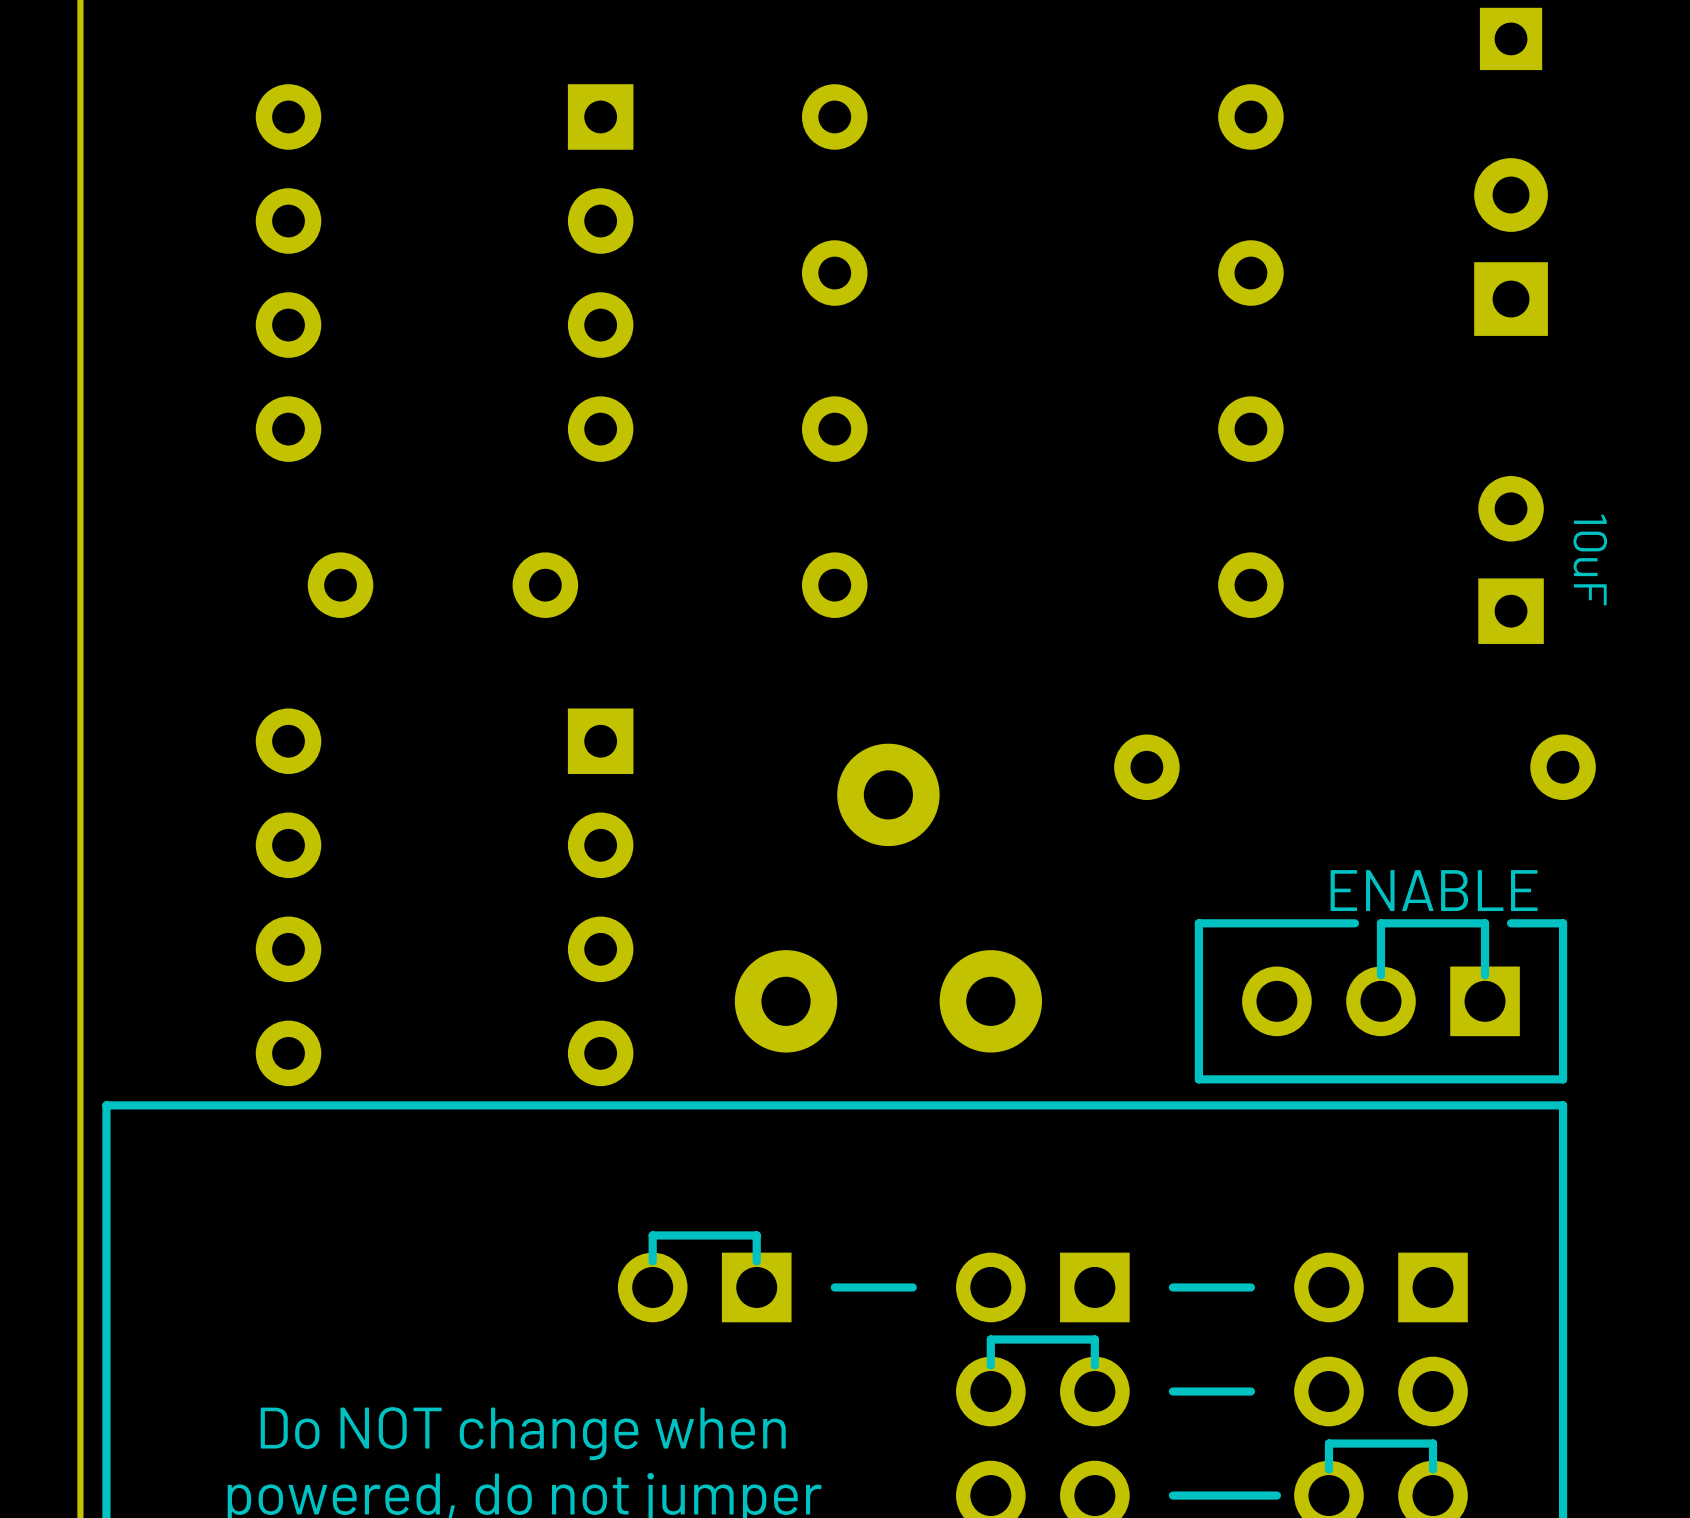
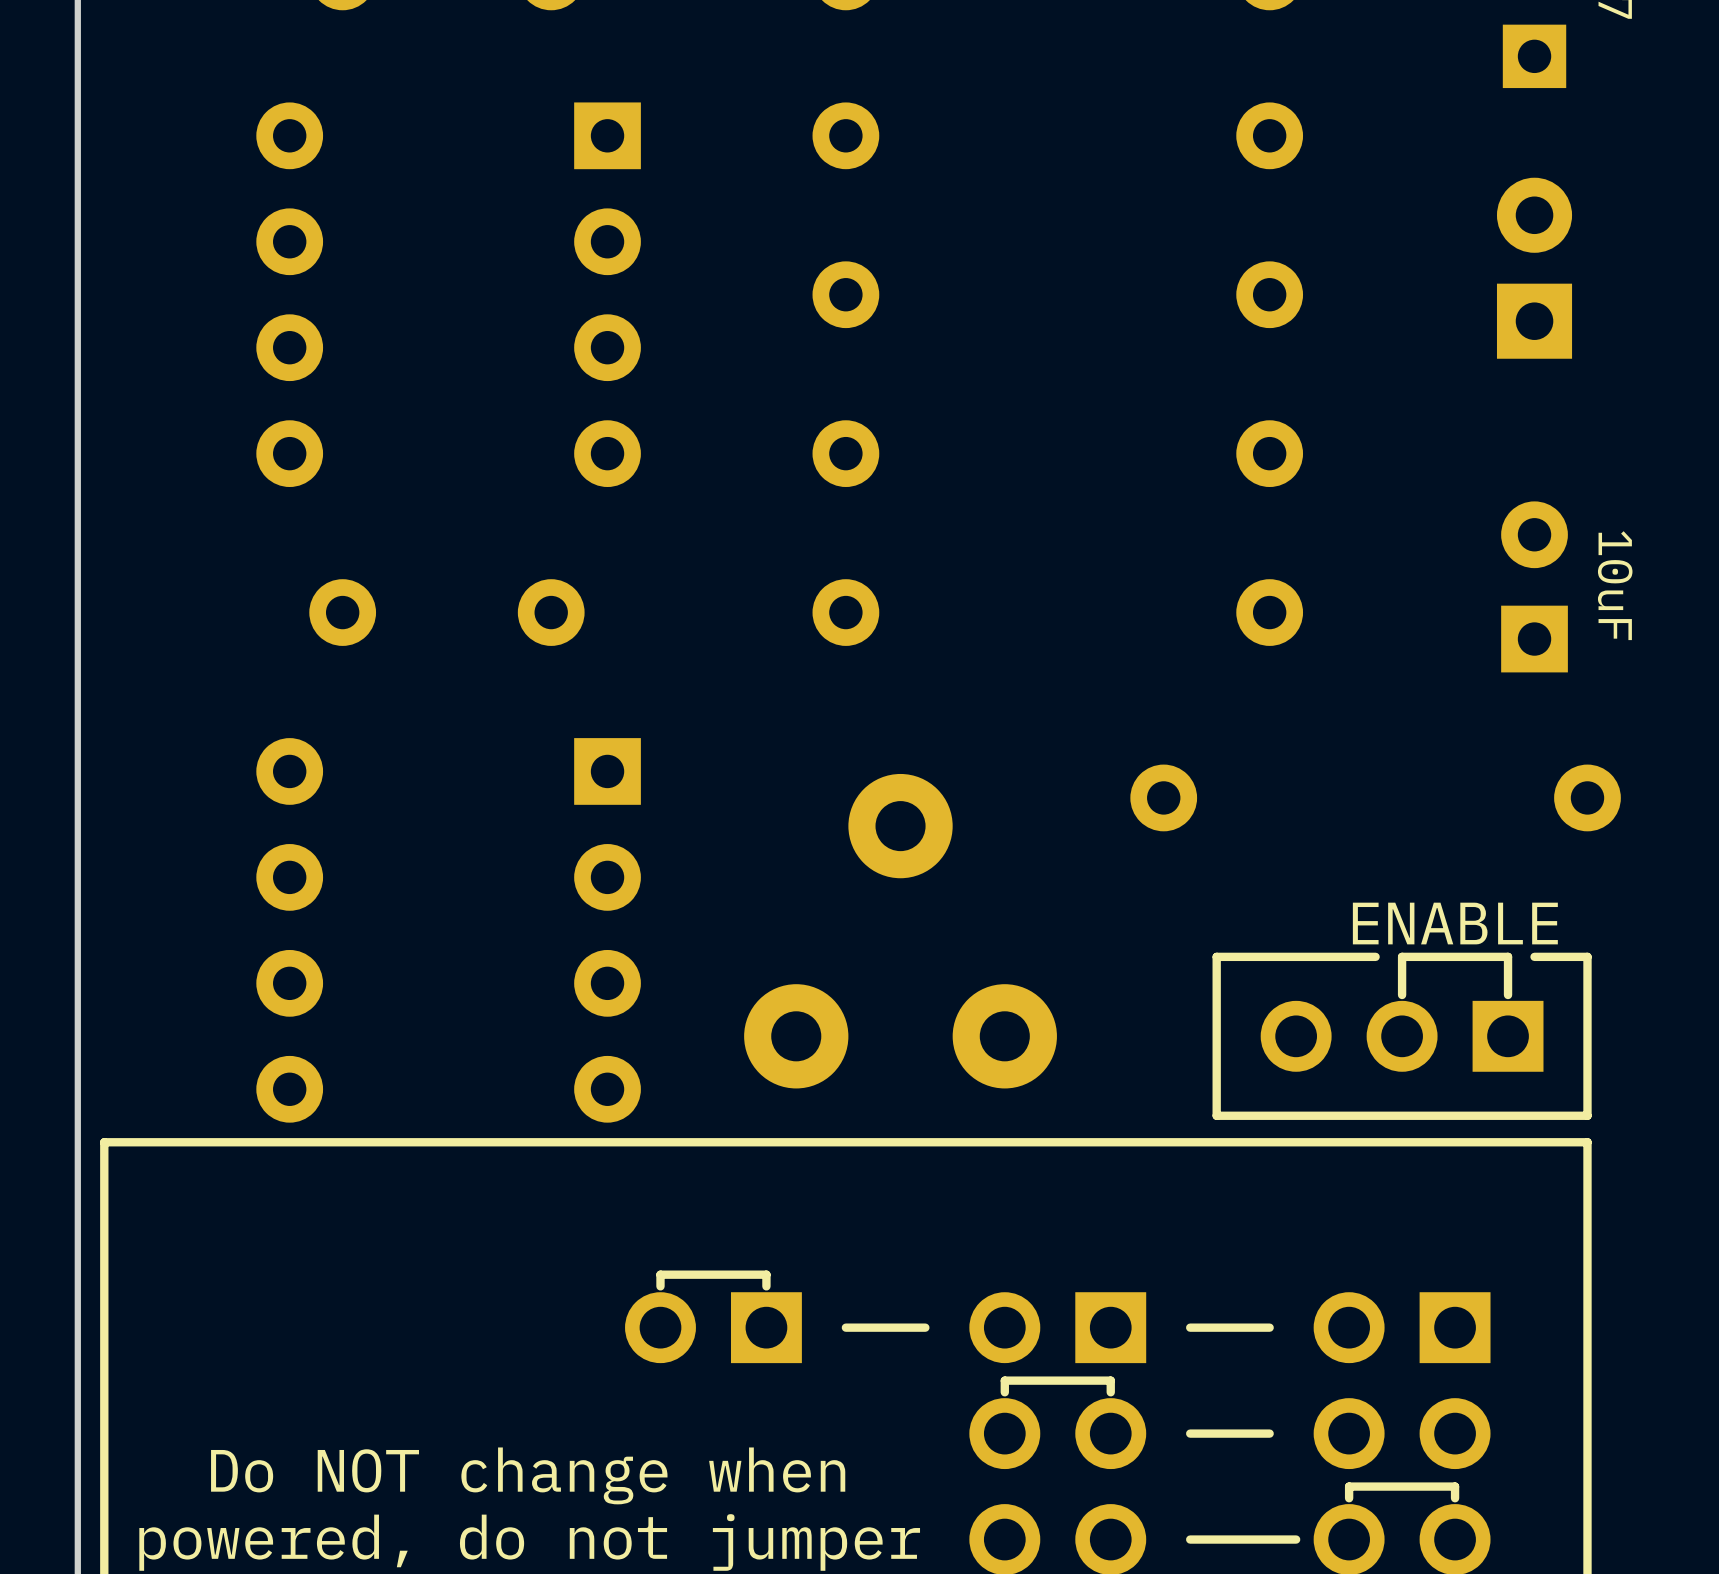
line: (1380, 960) (1380, 975) -> none
line: (1485, 960) (1485, 975) -> none
line: (652, 1246) (652, 1261) -> none
line: (756, 1246) (756, 1261) -> none
line: (990, 1350) (990, 1365) -> none
line: (1094, 1350) (1094, 1365) -> none
line: (1328, 1455) (1328, 1469) -> none
line: (1433, 1455) (1433, 1469) -> none

